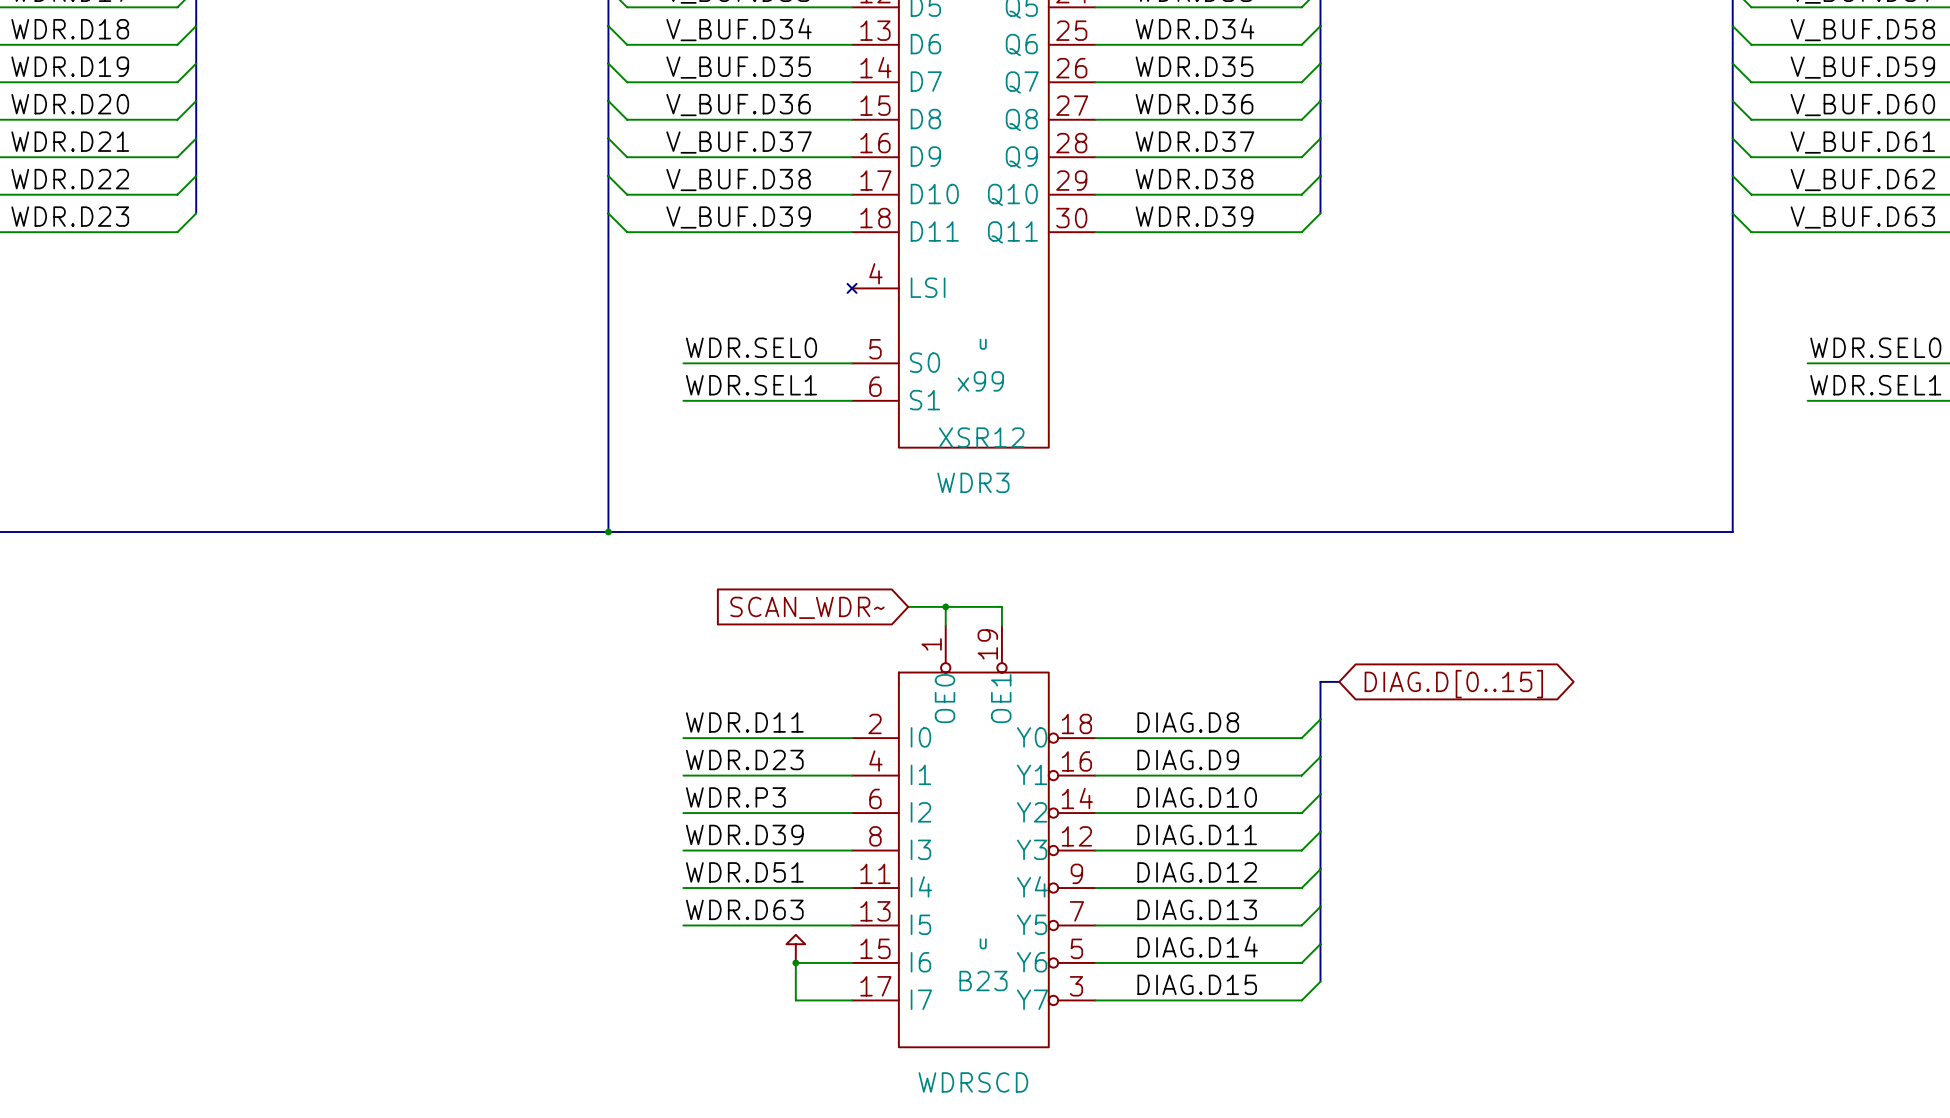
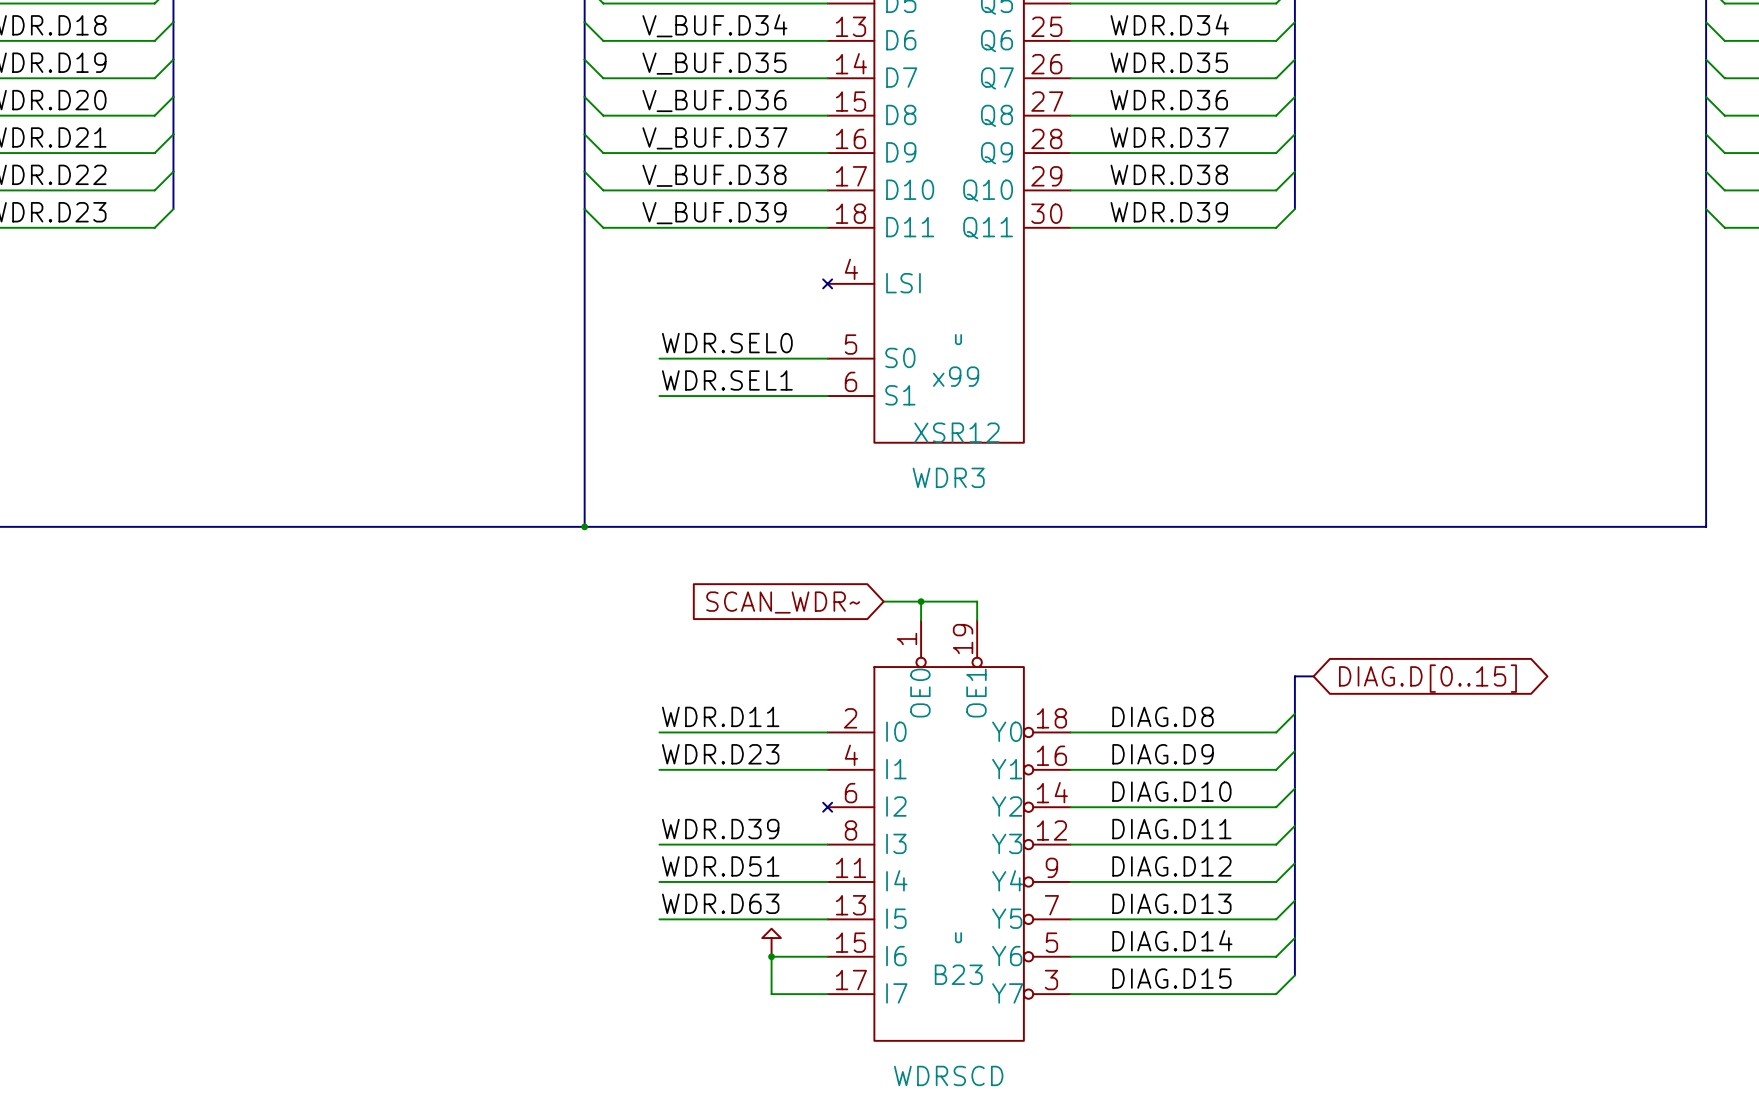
label: WDR.P3 (735, 797) -> none
wire: (683, 813) (852, 813) -> none
no-connect mark: none -> (827, 807)

